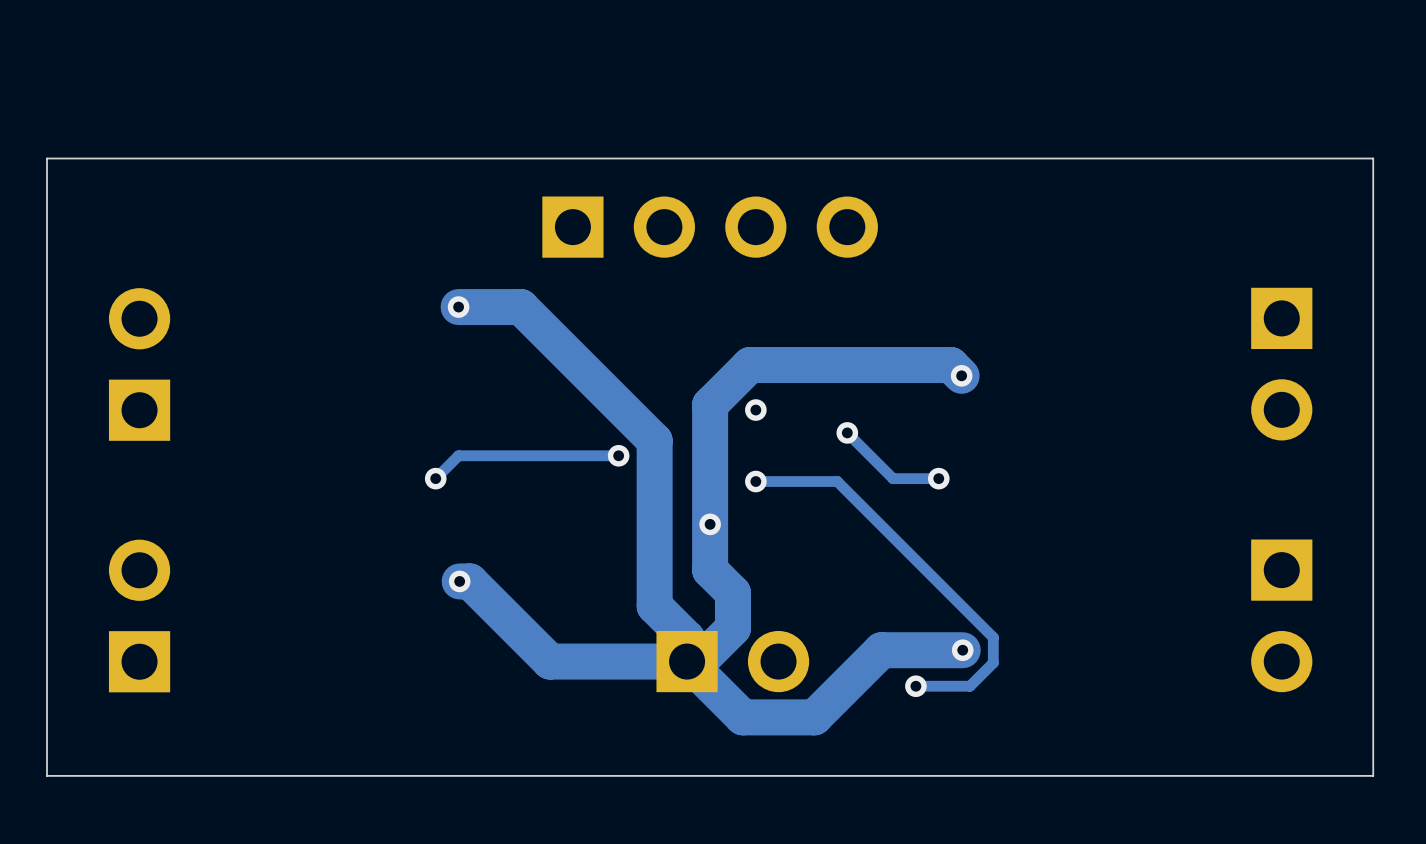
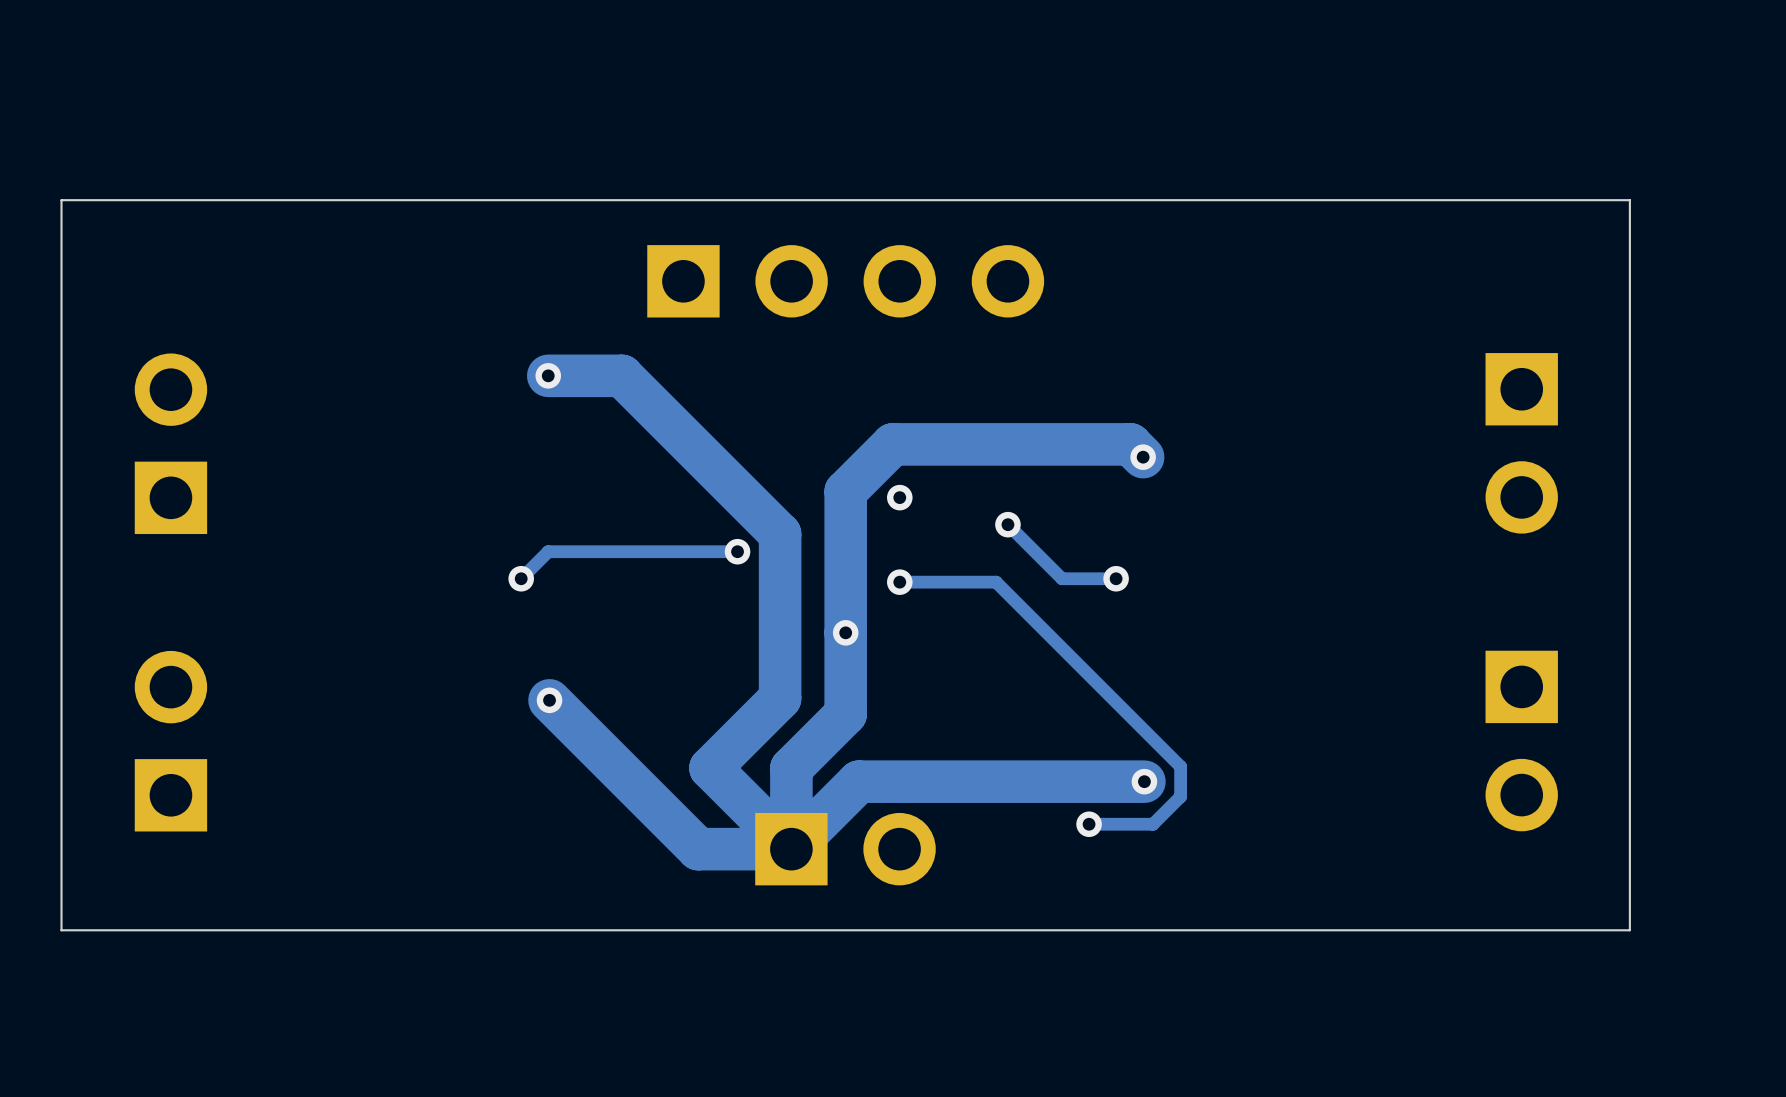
track: (710, 570) (732, 592) (732, 628) (699, 661) (550, 661) (469, 581) (459, 581) -> (791, 849) (698, 849) (549, 700)
track: none -> (845, 686) (845, 713) (791, 768) (791, 849)
track: (654, 579) (654, 606) (687, 638) (687, 661) (742, 717) (814, 717) (881, 650) -> (791, 849) (858, 781) (1048, 781)
track: none -> (780, 698) (710, 768) (791, 848)
part position: (732, 661) -> (845, 849)

